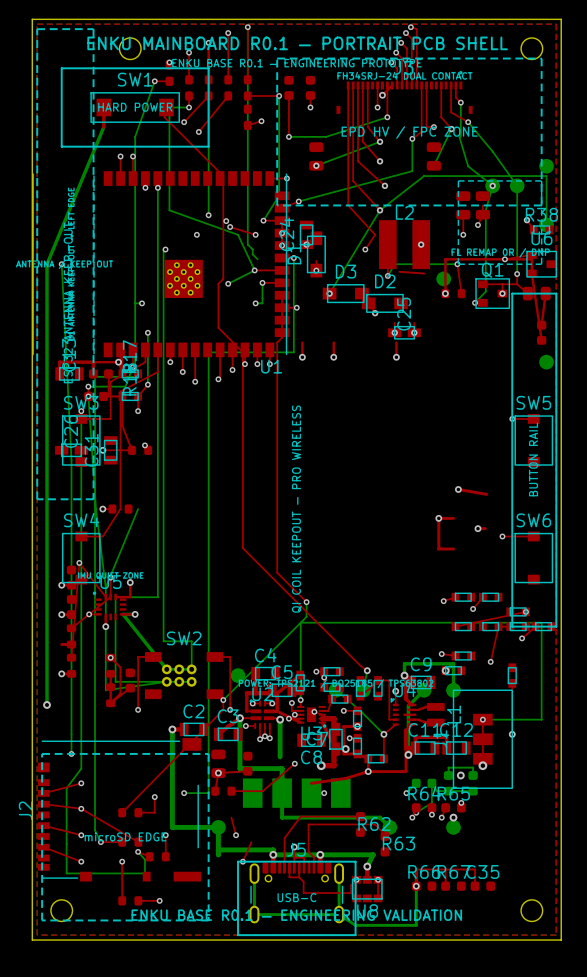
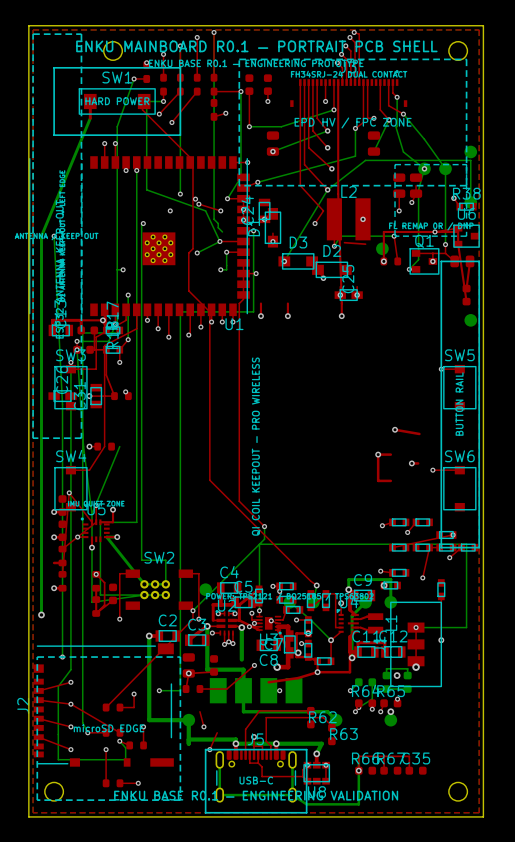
top track: (392, 85) (382, 95) -> (338, 82) (338, 194) (341, 303)
via: (382, 95) -> none

